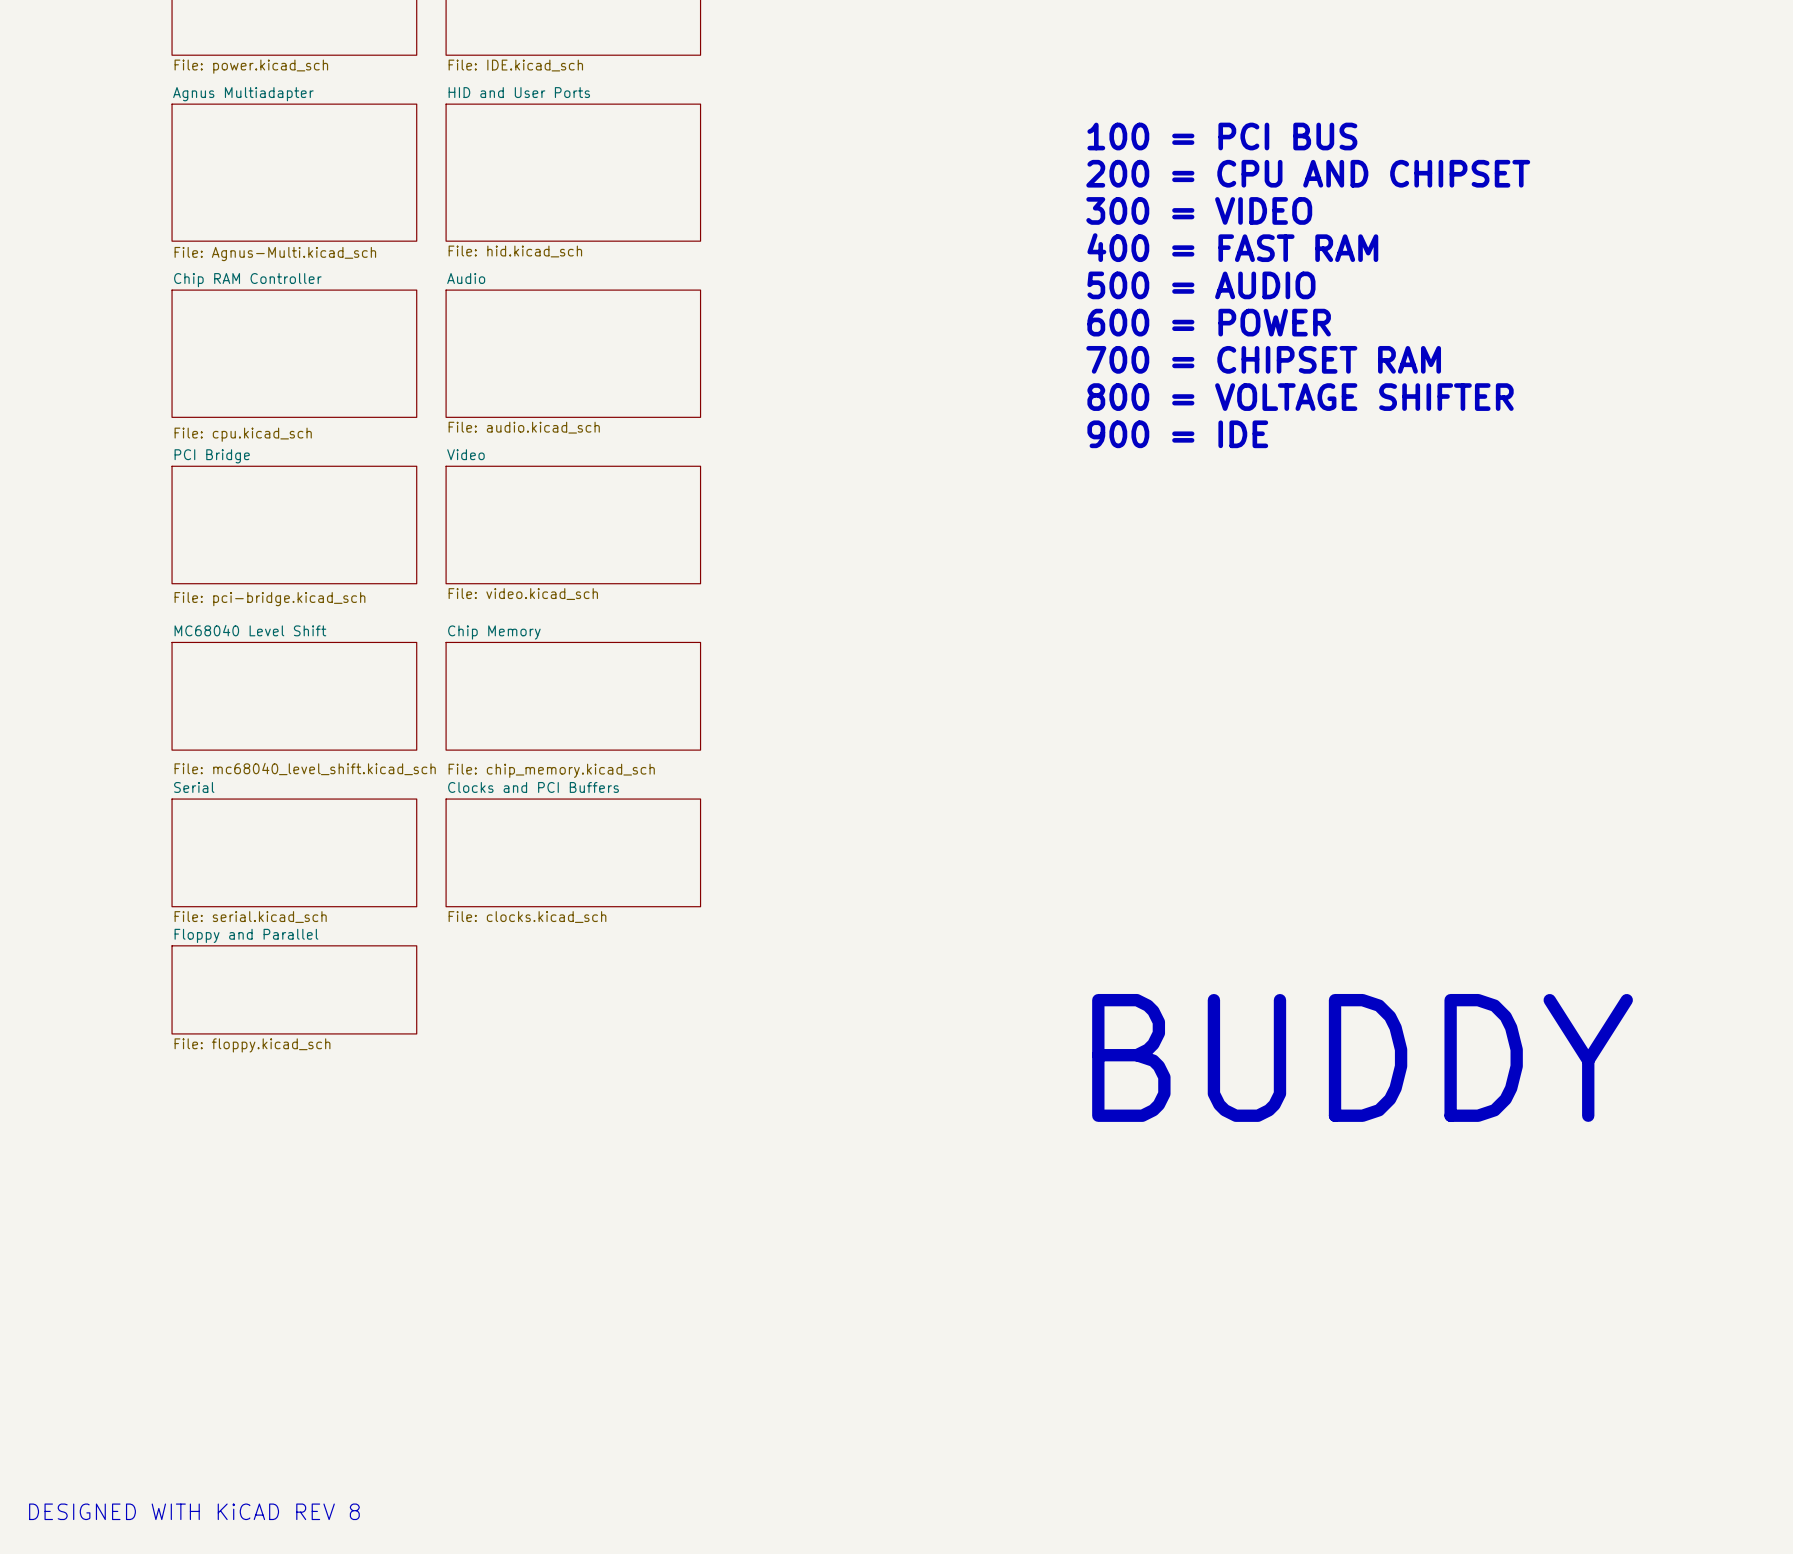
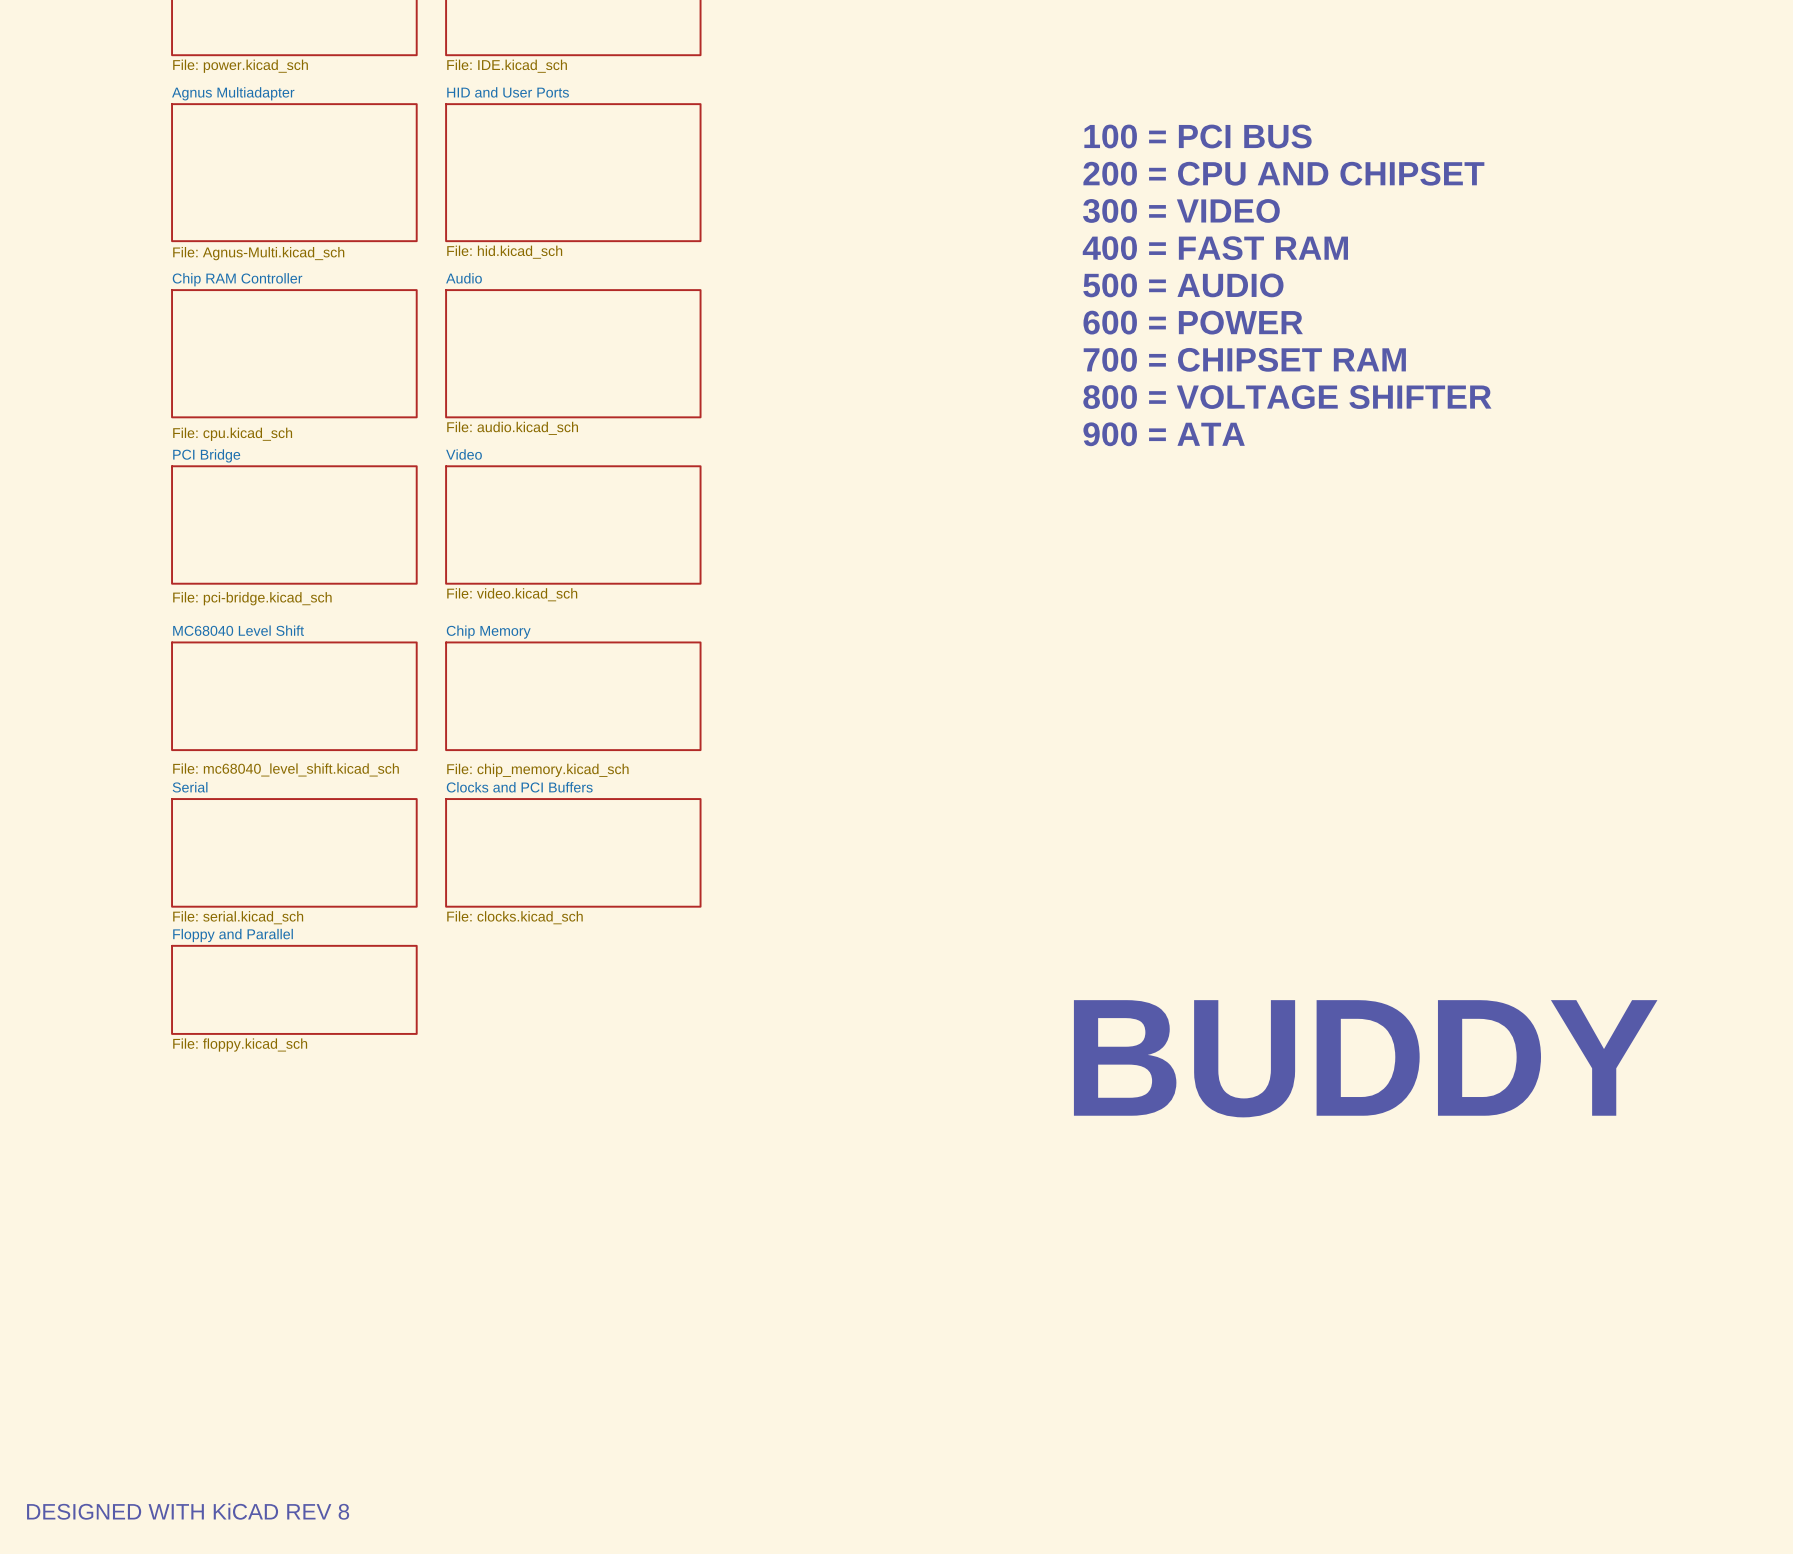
text: 900 = IDE (1177, 434) -> 900 = ATA (1164, 434)

